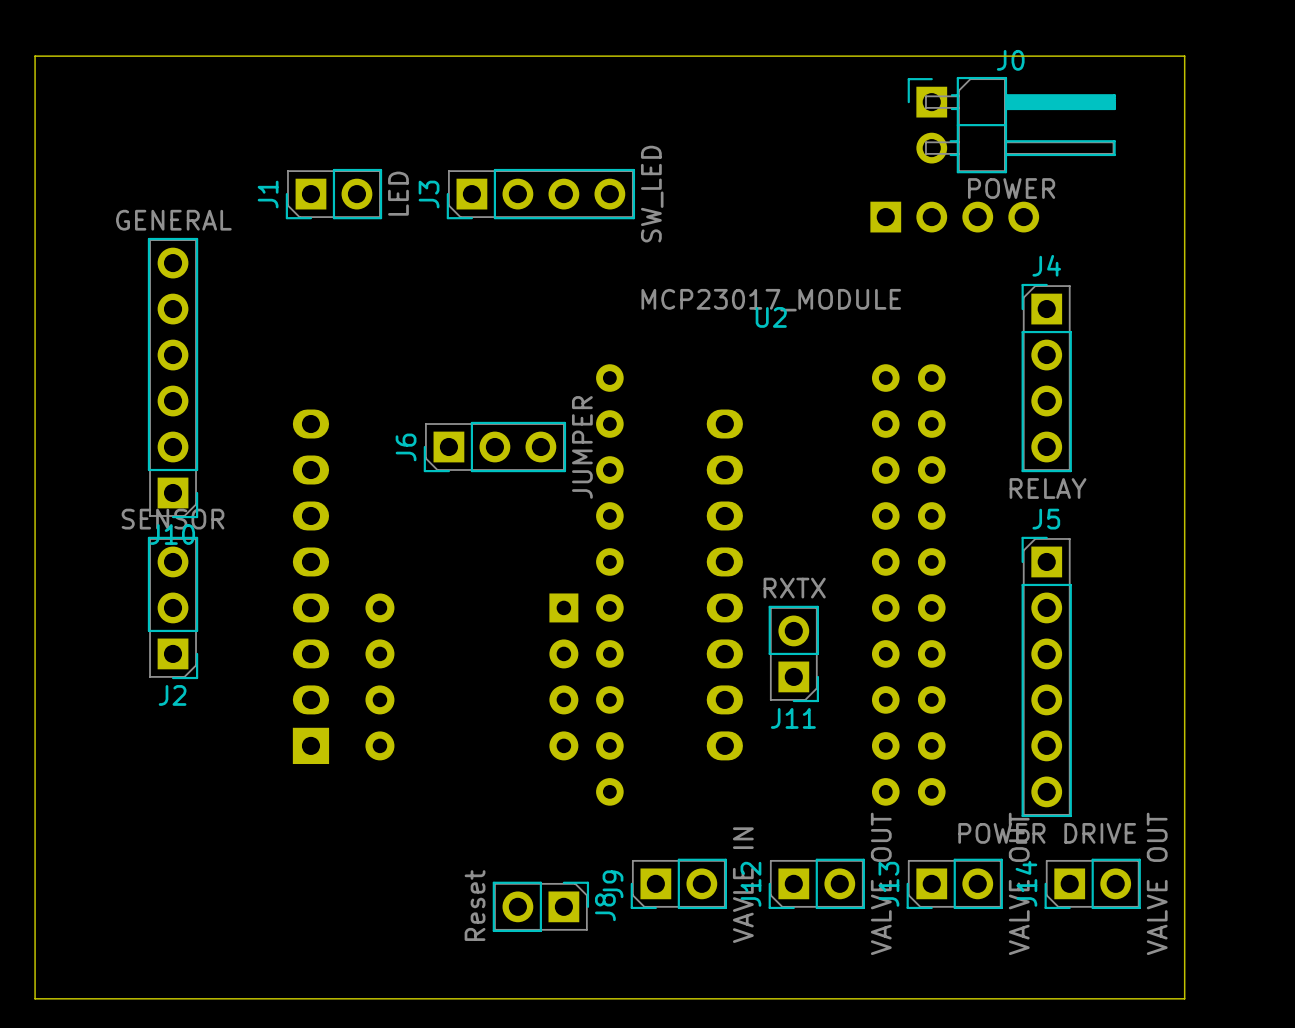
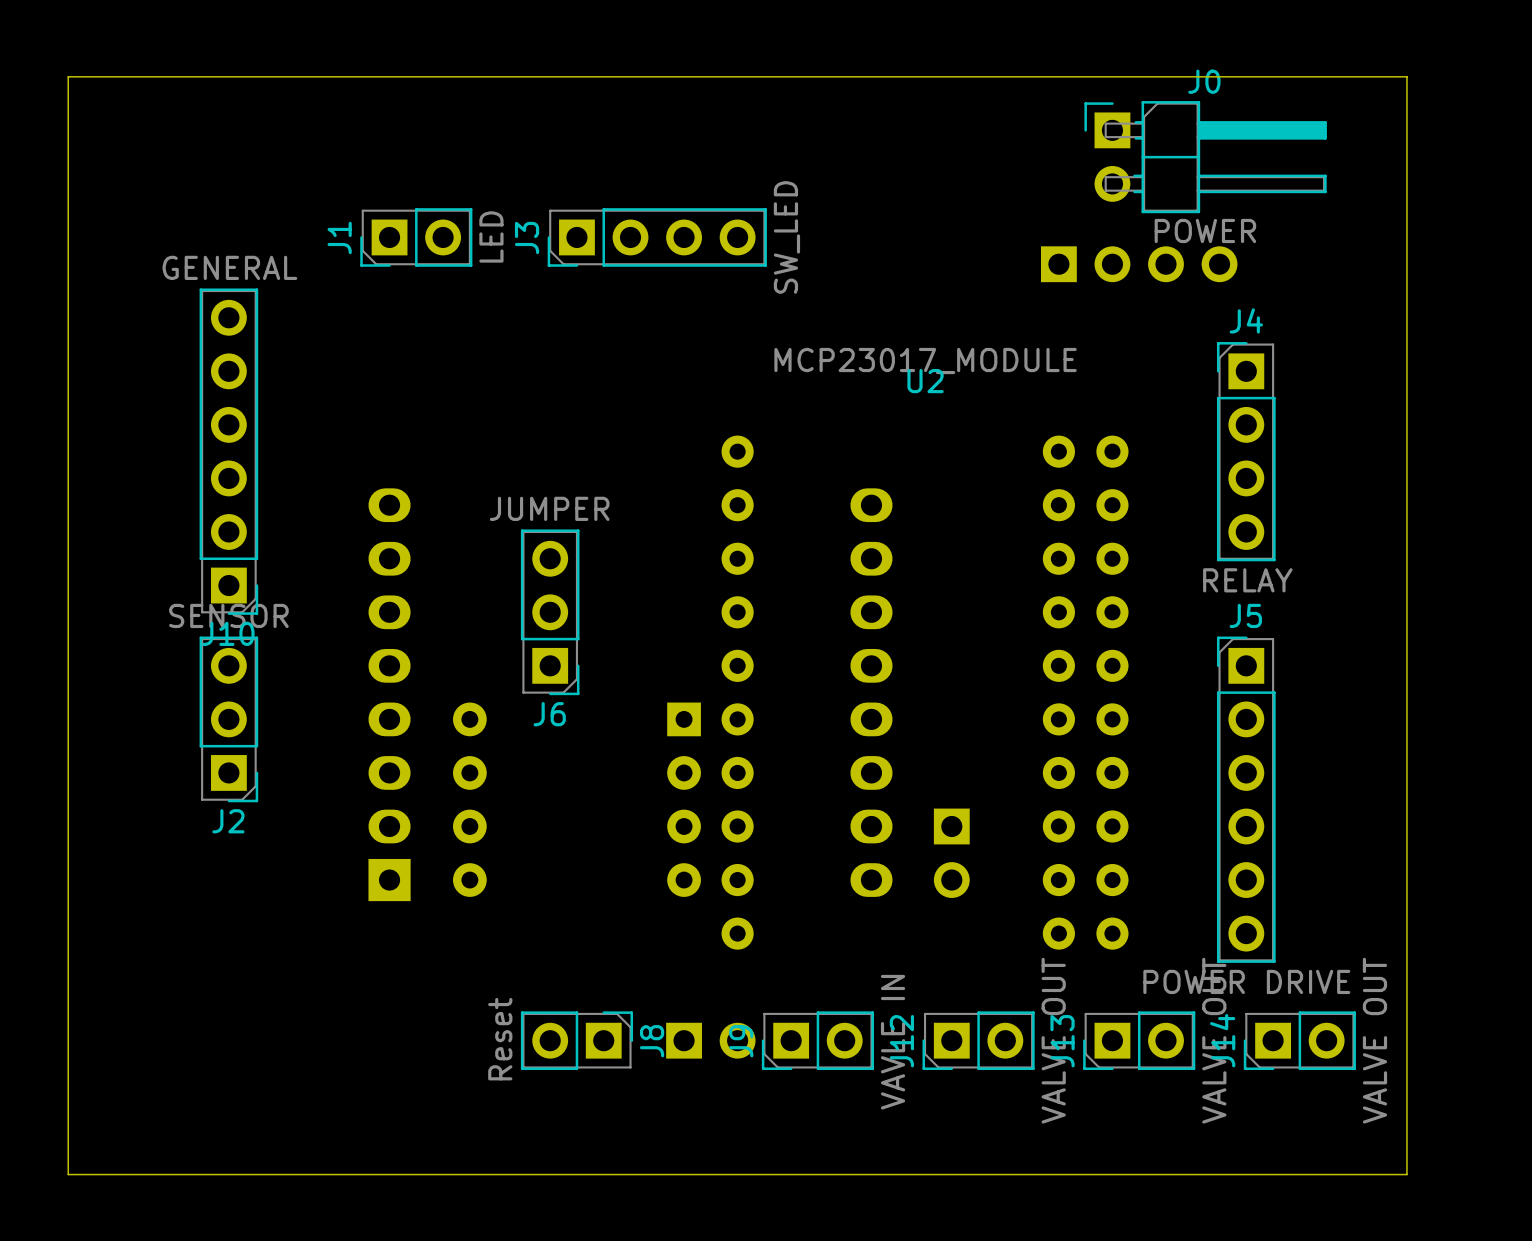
J6 rotation: 0° (494, 447) -> 90° counterclockwise (550, 612)
J11 side: top (793, 653) -> bottom (951, 853)
part: none -> (710, 1040)
J8 position: (540, 906) -> (576, 1040)

